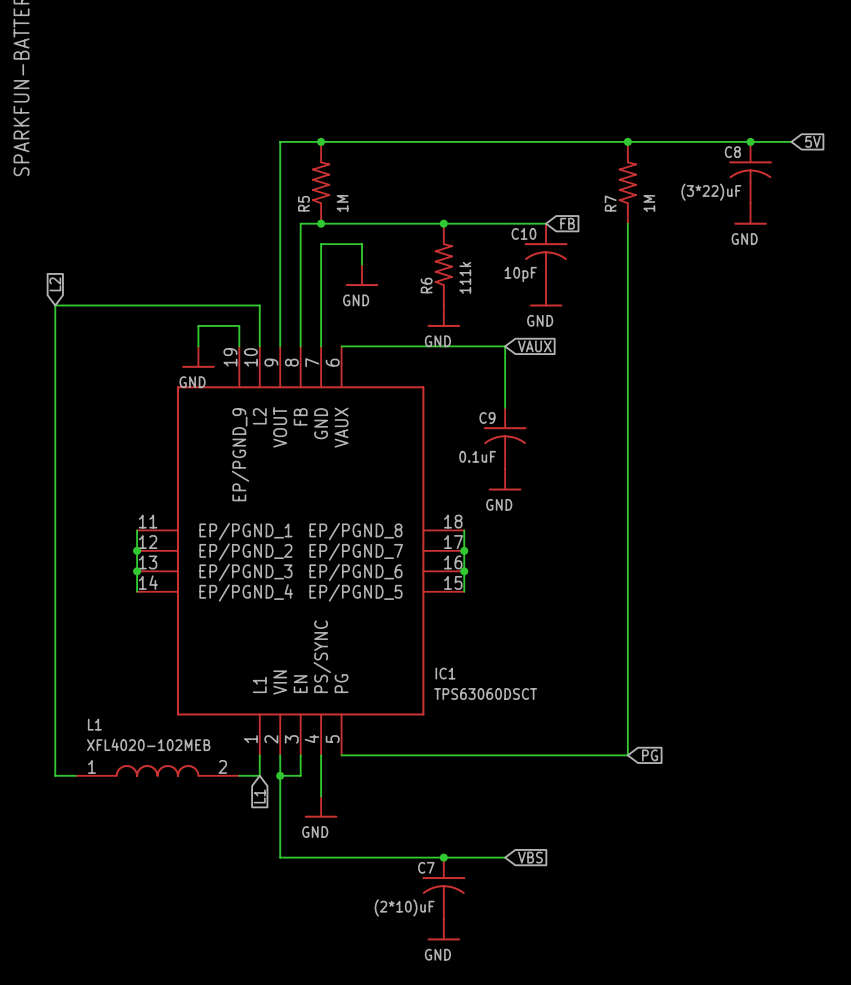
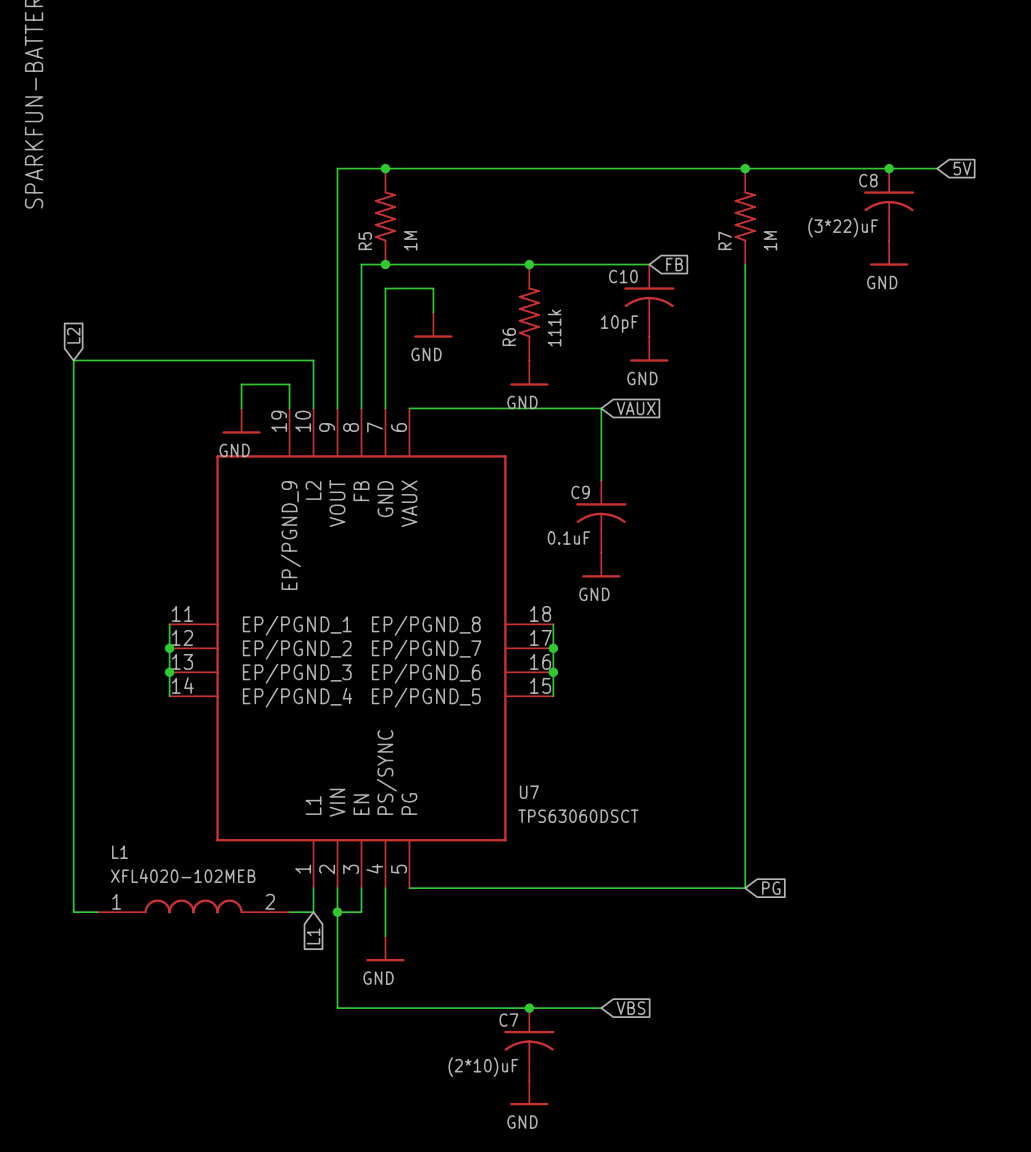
IC1 name: IC1 (445, 673) -> U7 (529, 792)

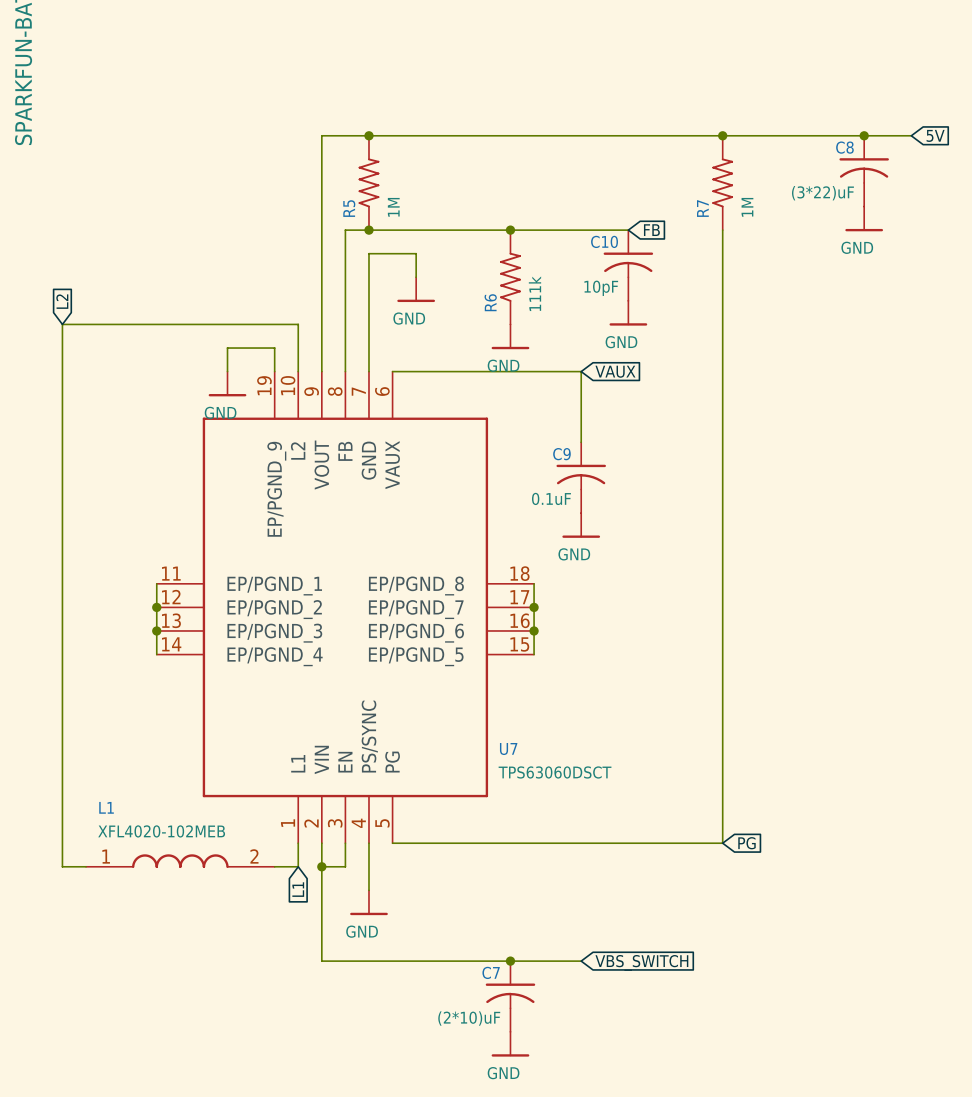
global label: VBS (631, 1008) -> VBS_SWITCH (641, 962)

